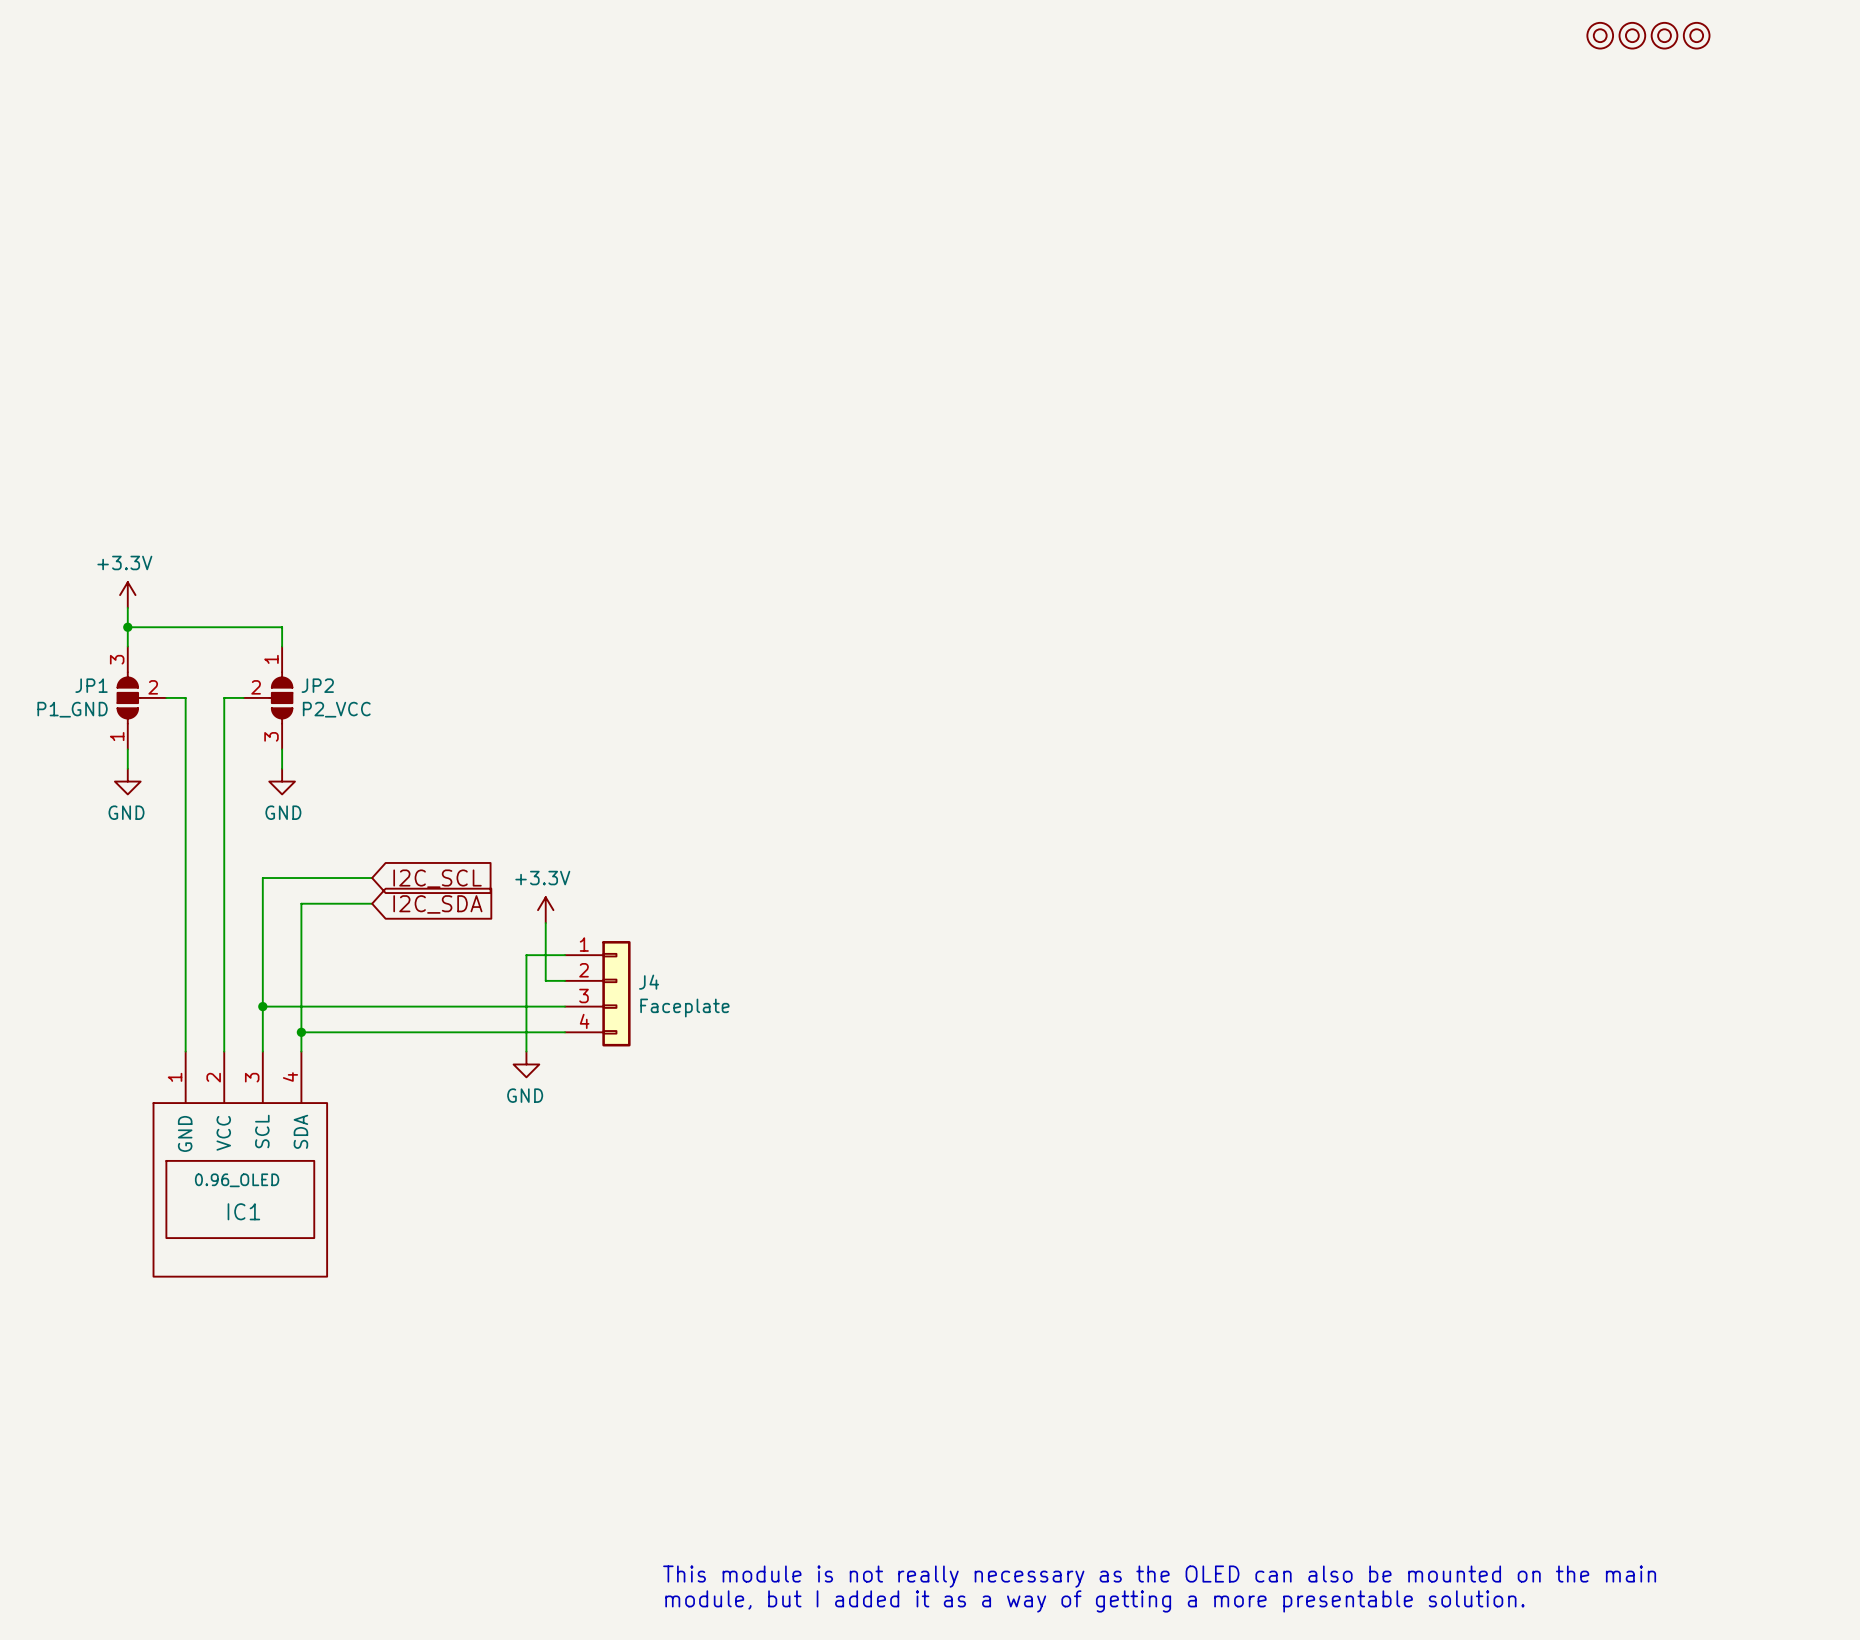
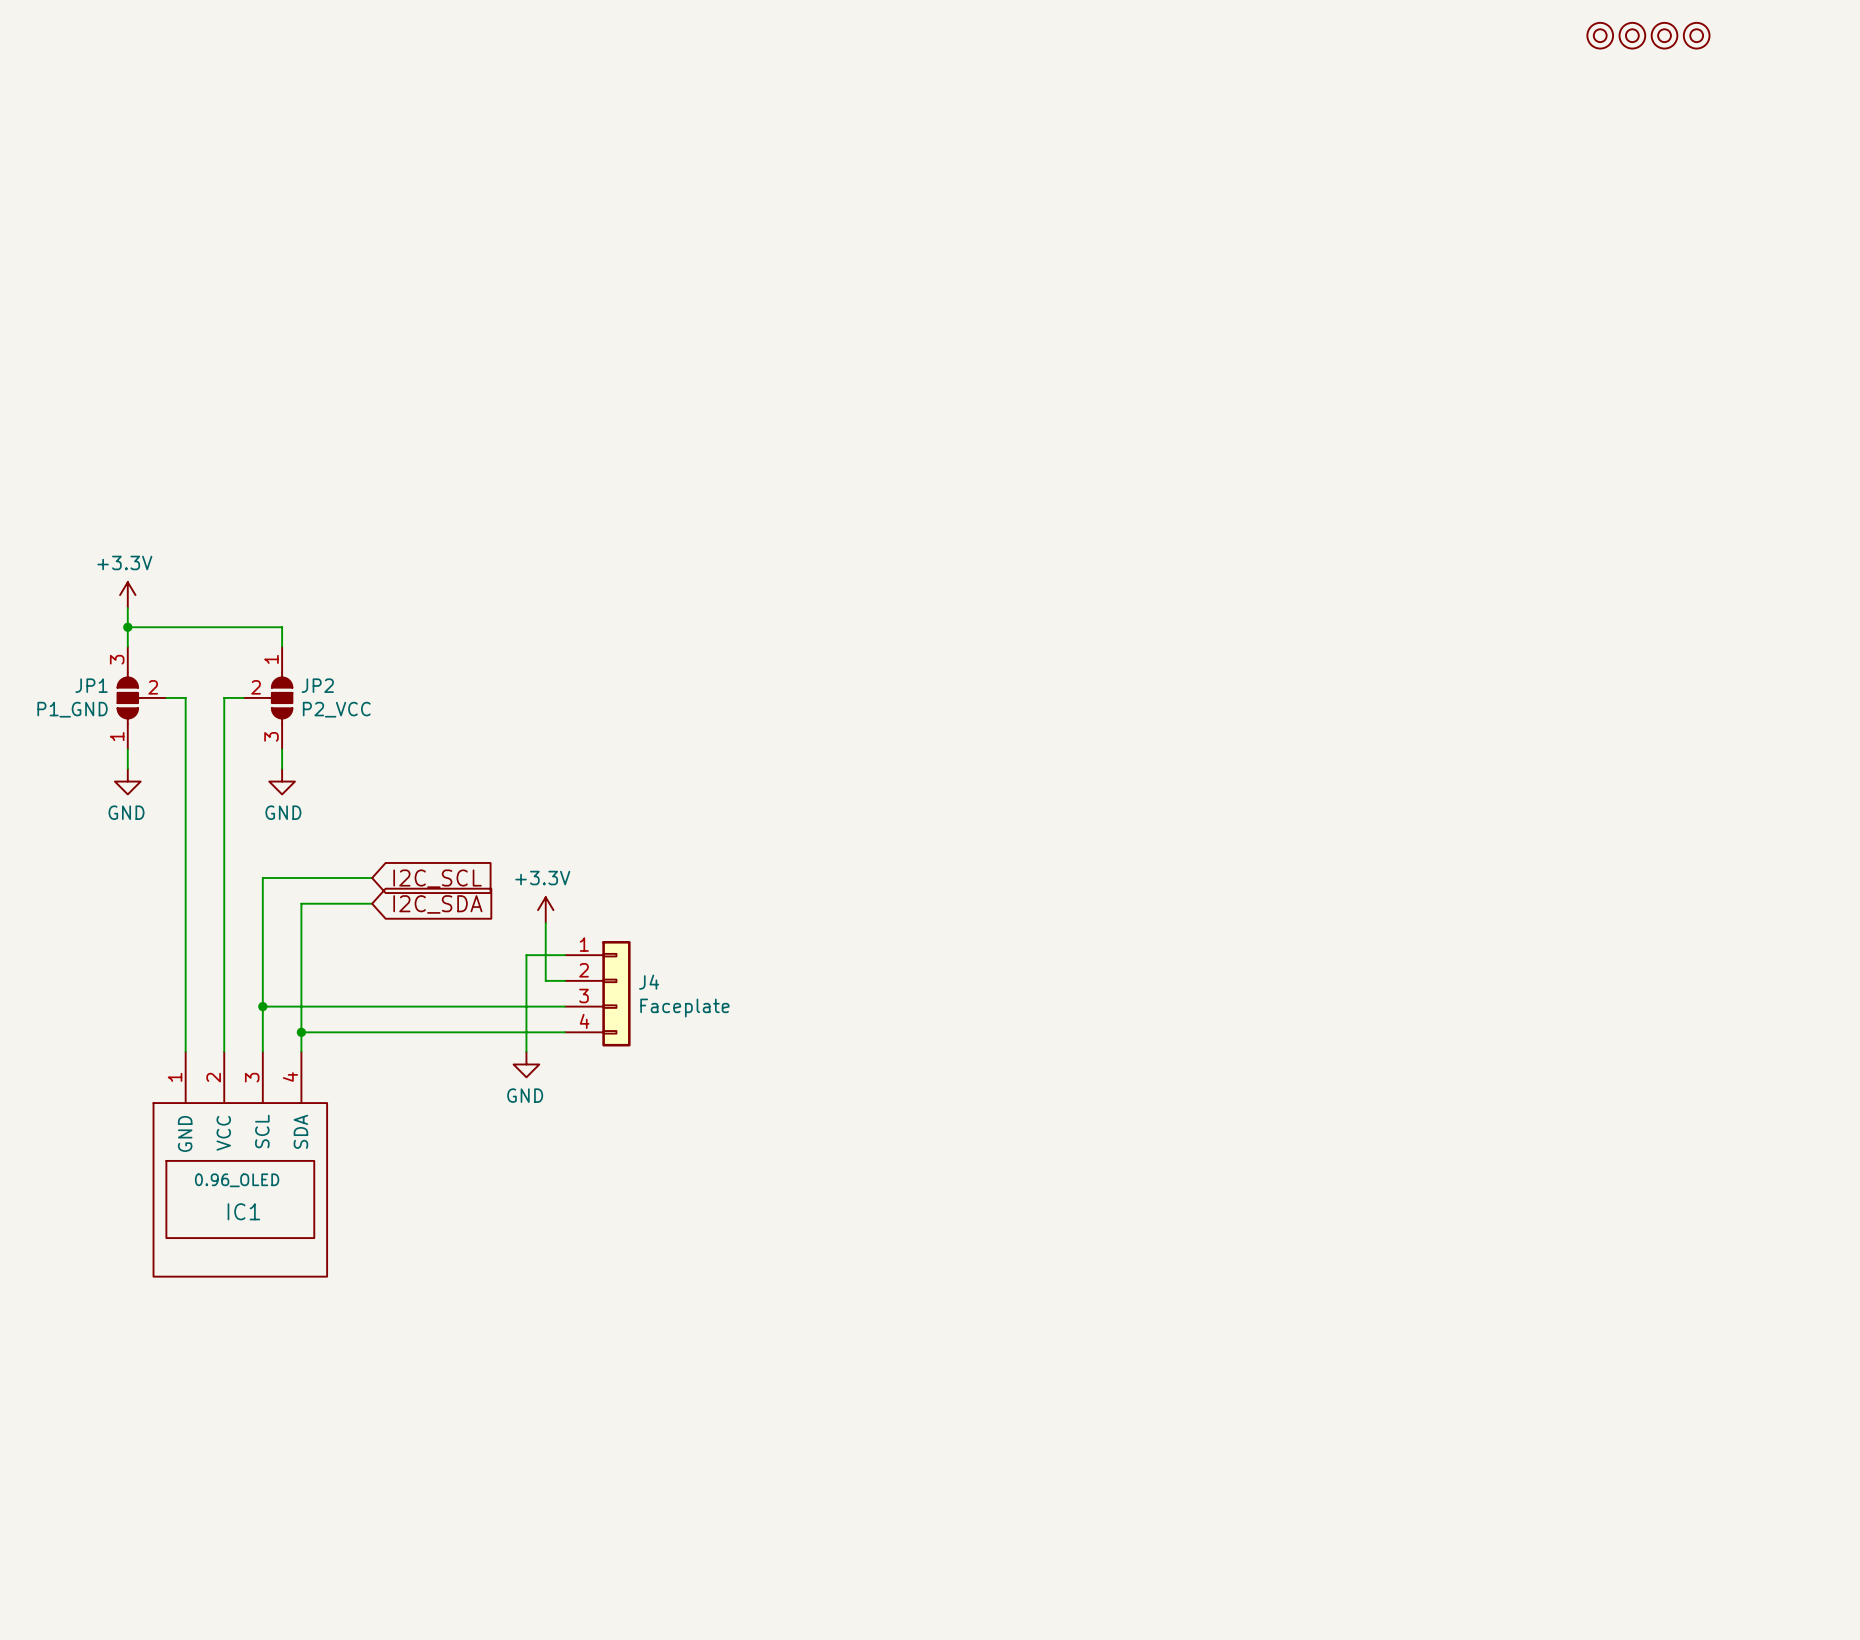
text: This module is not really necessary as the OLED can also be mounted on the main (1159, 1576) -> none
text: module, but I added it as a way of getting a more presentable solution. (1094, 1601) -> none

